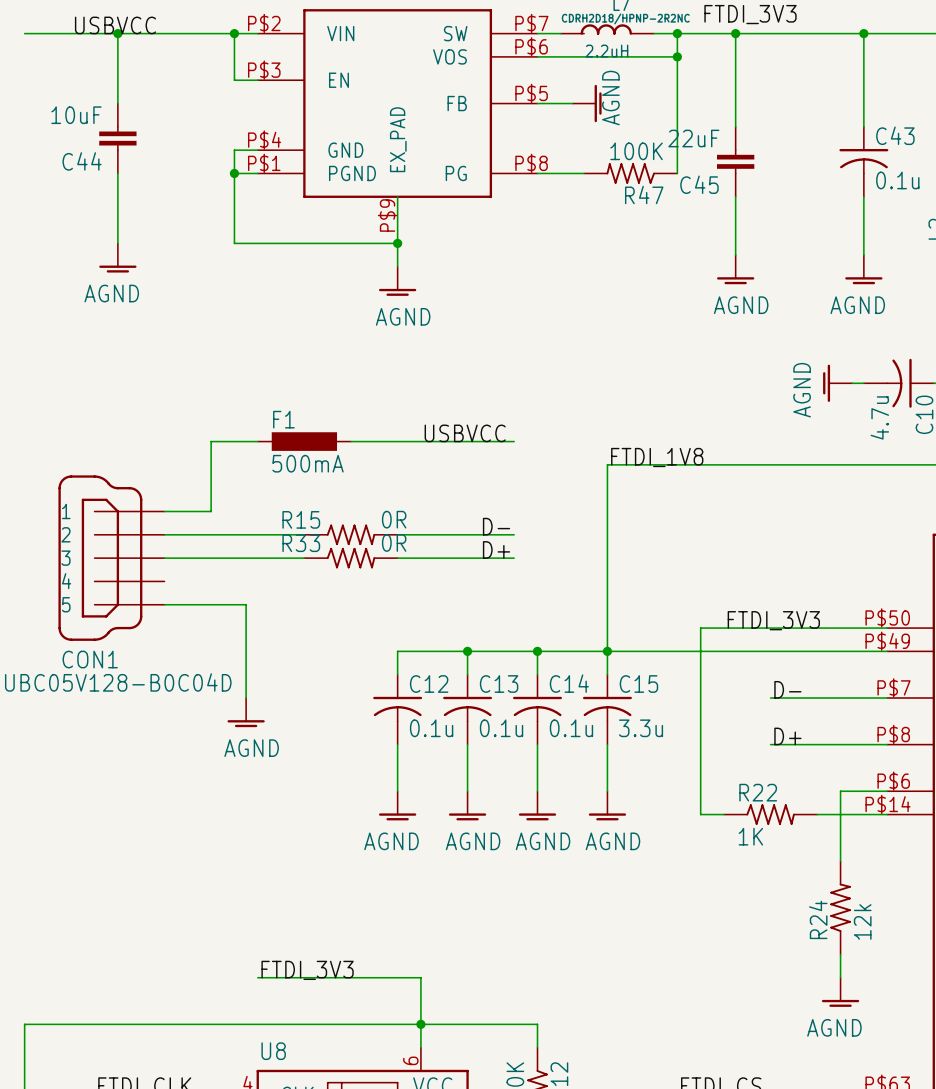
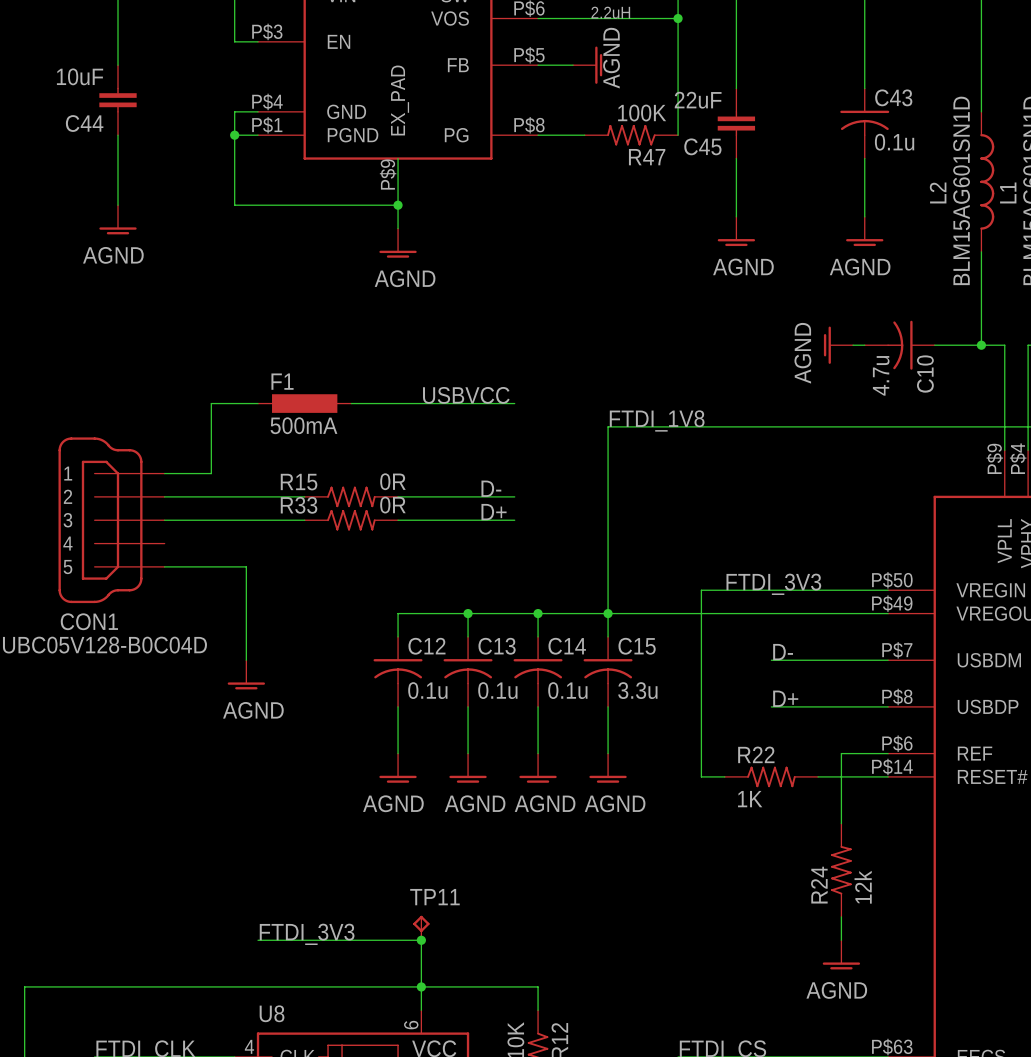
TP11: none -> (421, 928)
junction: none -> (421, 940)

